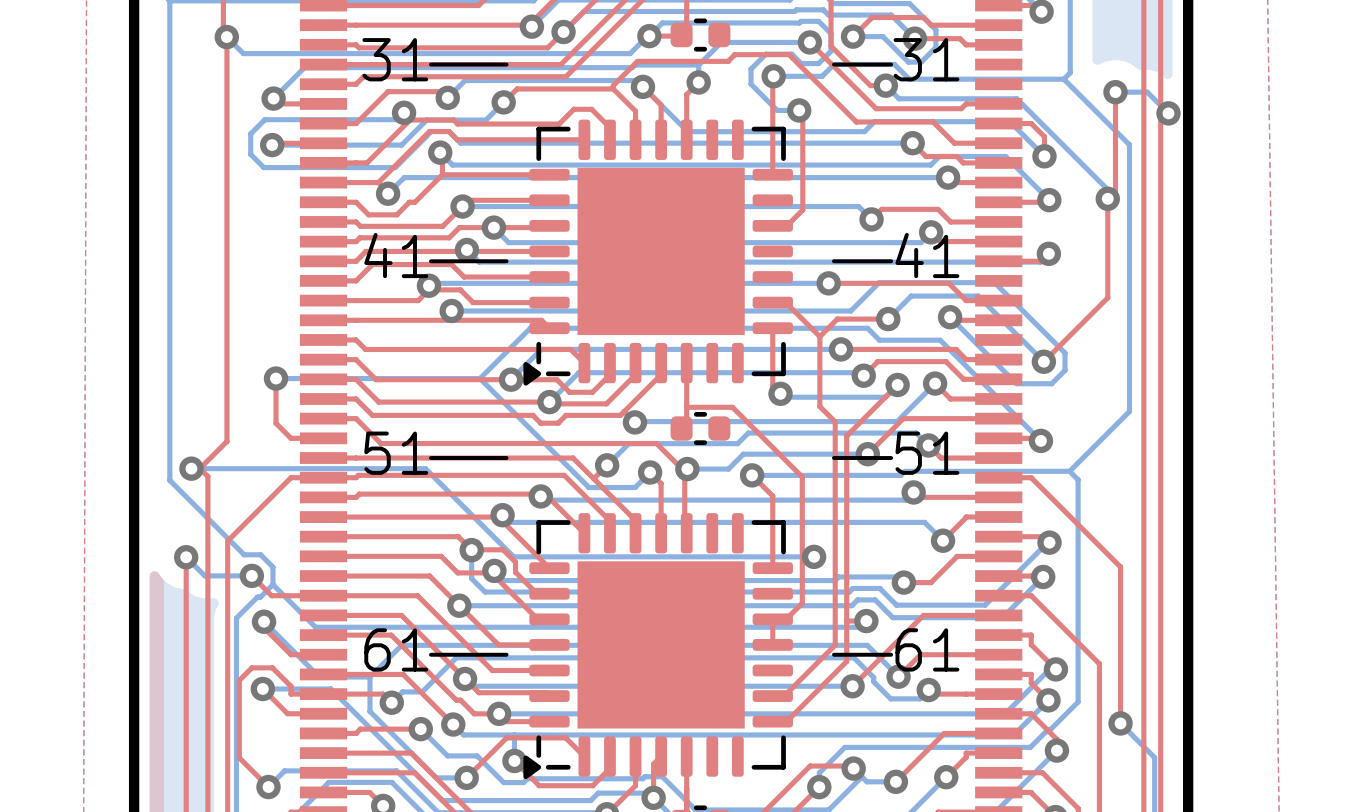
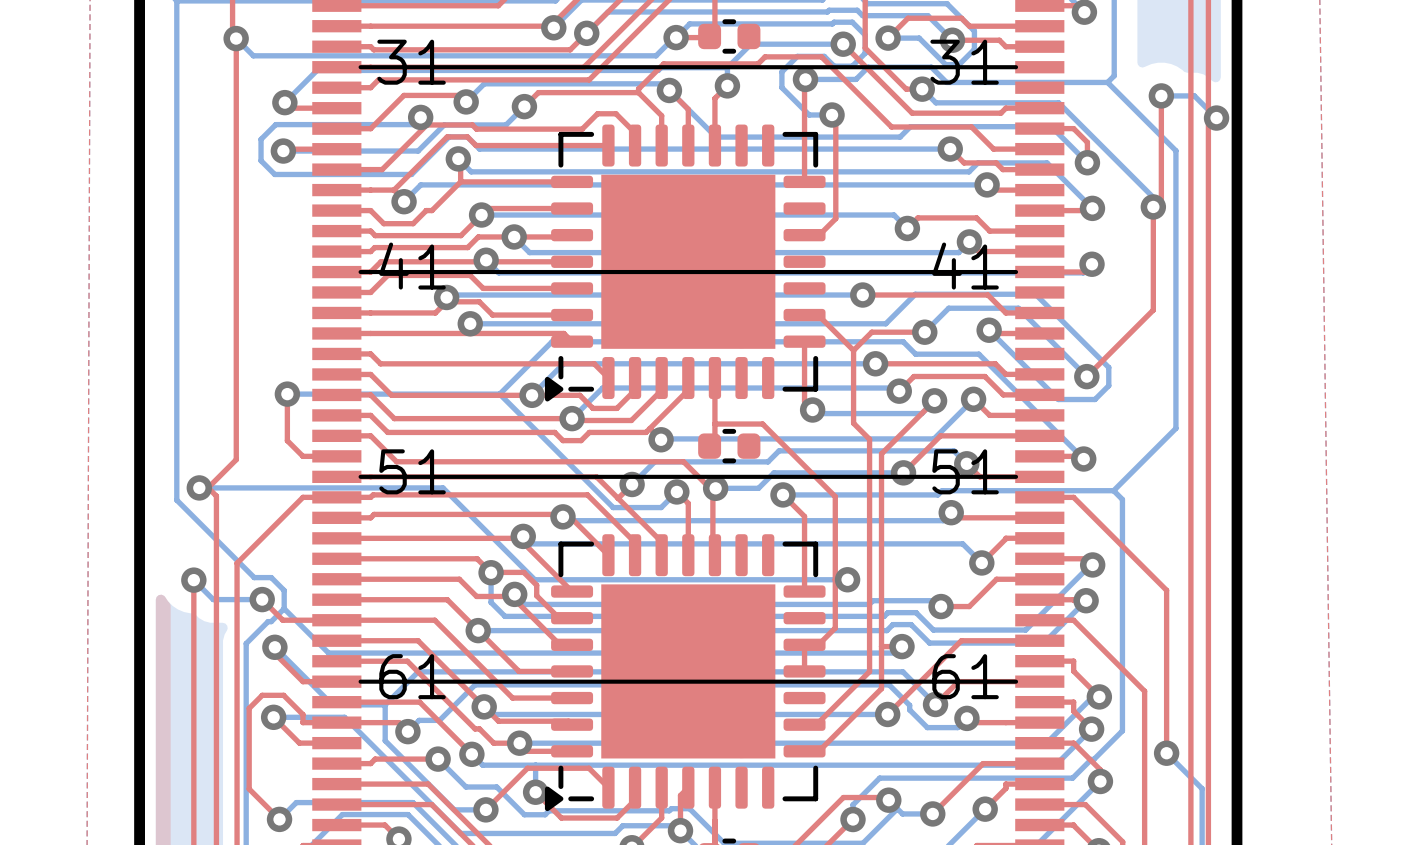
line: none -> (360, 67) (448, 67)
line: none -> (527, 67) (868, 67)
line: none -> (927, 67) (1016, 67)
line: none -> (360, 272) (448, 272)
line: none -> (527, 272) (868, 272)
line: none -> (927, 272) (1016, 272)
line: none -> (360, 476) (448, 476)
line: none -> (527, 476) (868, 476)
line: none -> (927, 476) (1016, 476)
line: none -> (360, 681) (448, 681)
line: none -> (527, 681) (868, 681)
line: none -> (927, 681) (1016, 681)

